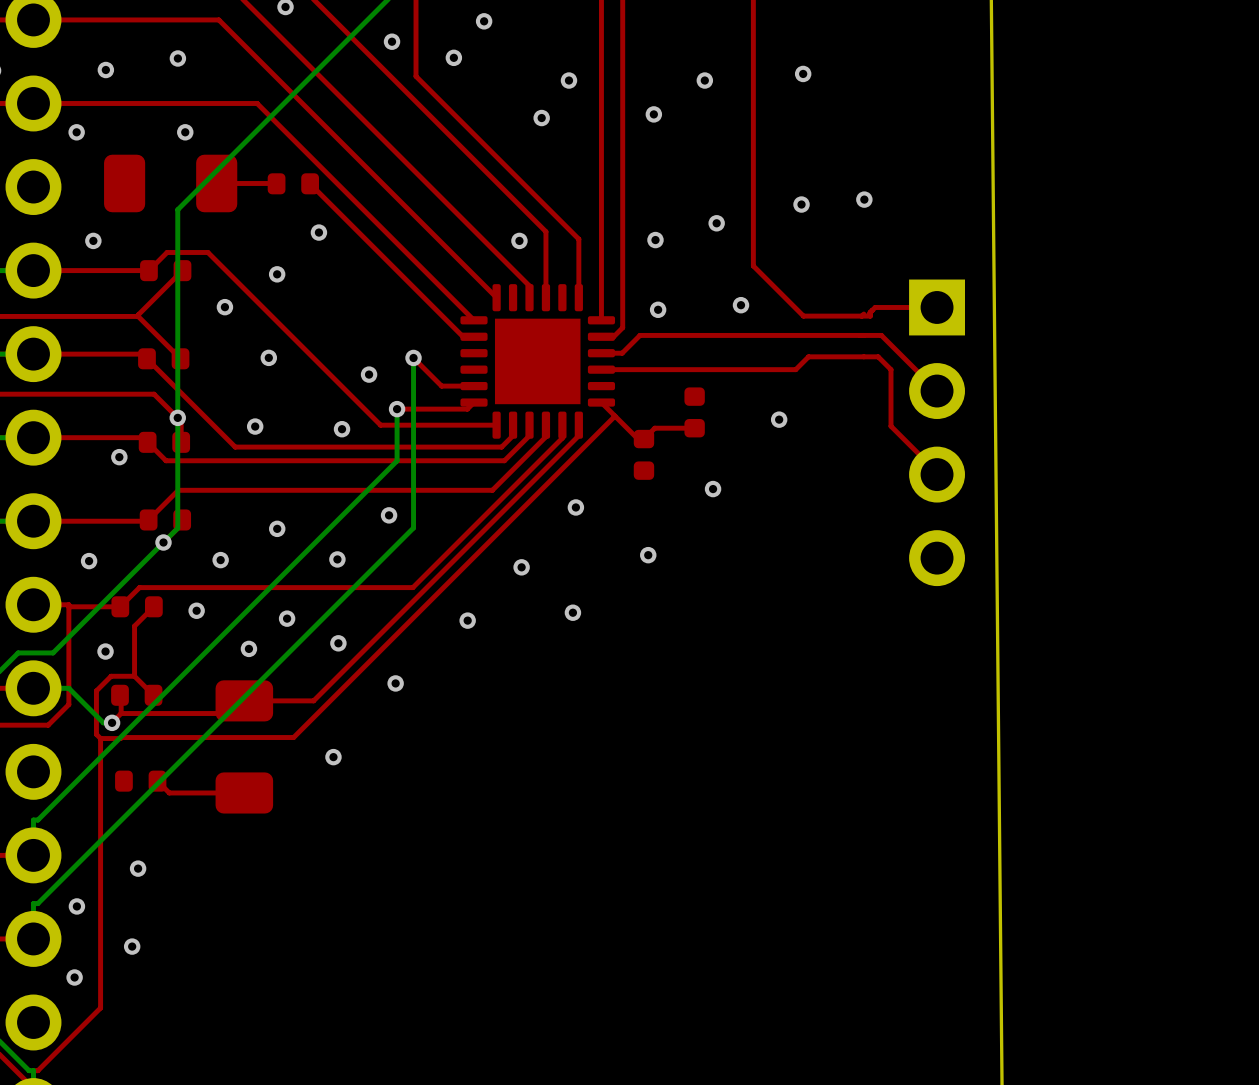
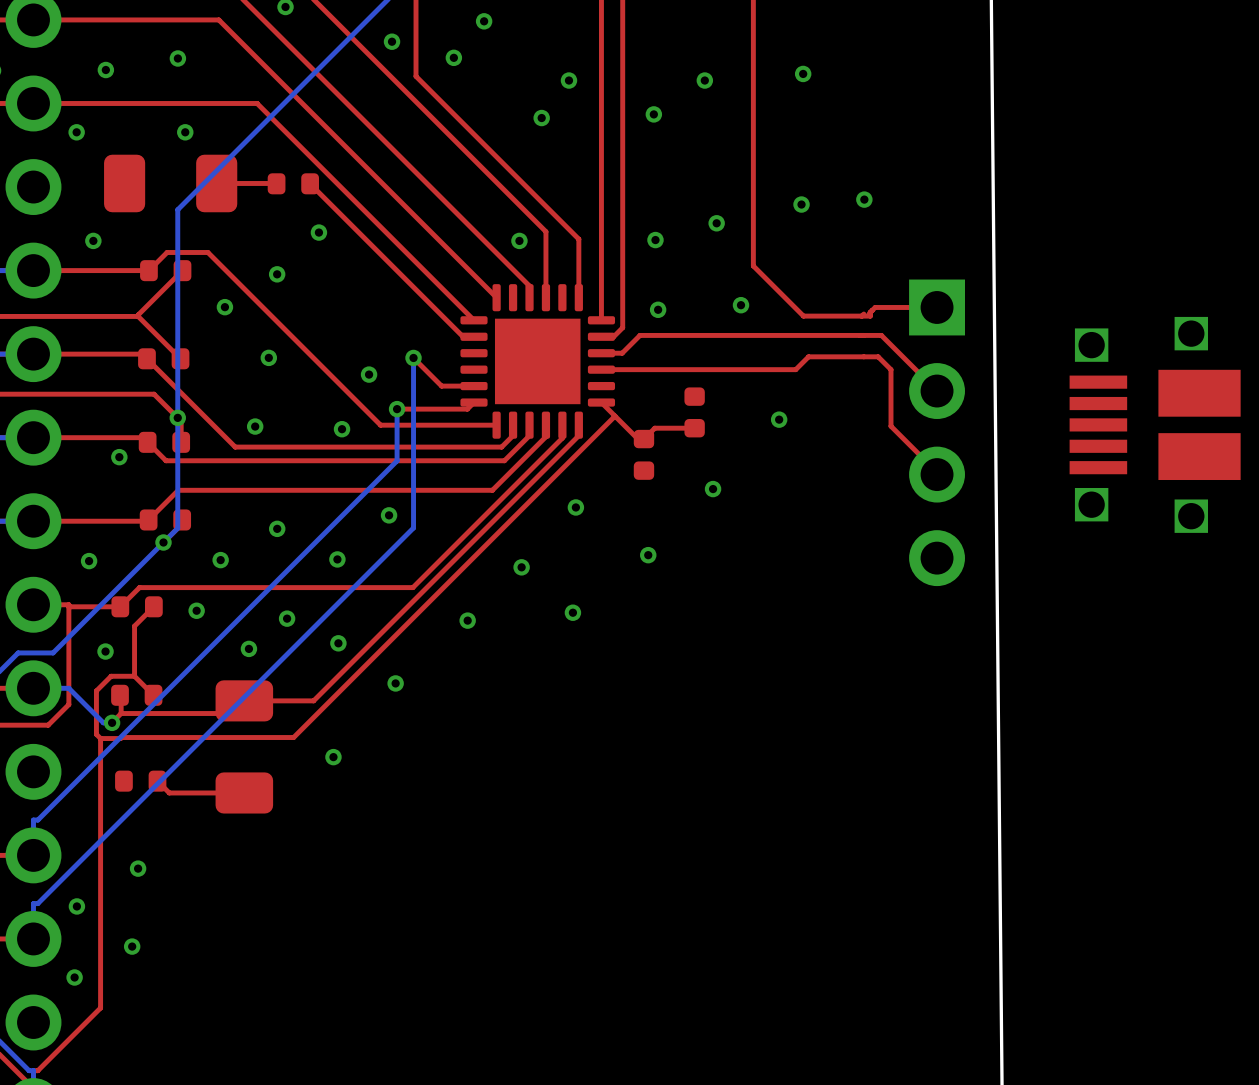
part: none -> (1155, 424)

